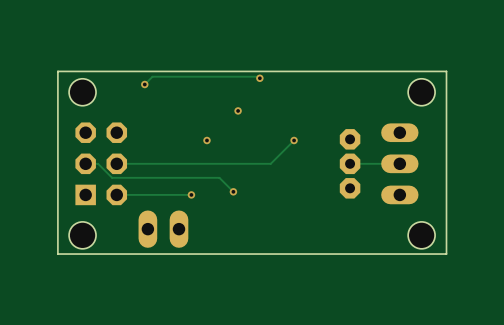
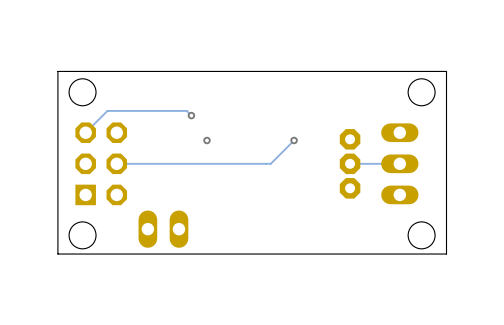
track: (259, 78) (258, 76) (152, 76) (144, 84) -> none
via: (259, 78) -> none
via: (144, 84) -> none
via: (238, 110) -> none
track: none -> (191, 115) (186, 110) (107, 110) (85, 132)
via: none -> (191, 115)
track: (85, 163) (98, 163) (112, 177) (219, 177) (233, 191) -> none
via: (233, 191) -> none
track: (191, 194) (116, 194) -> none
via: (191, 194) -> none

